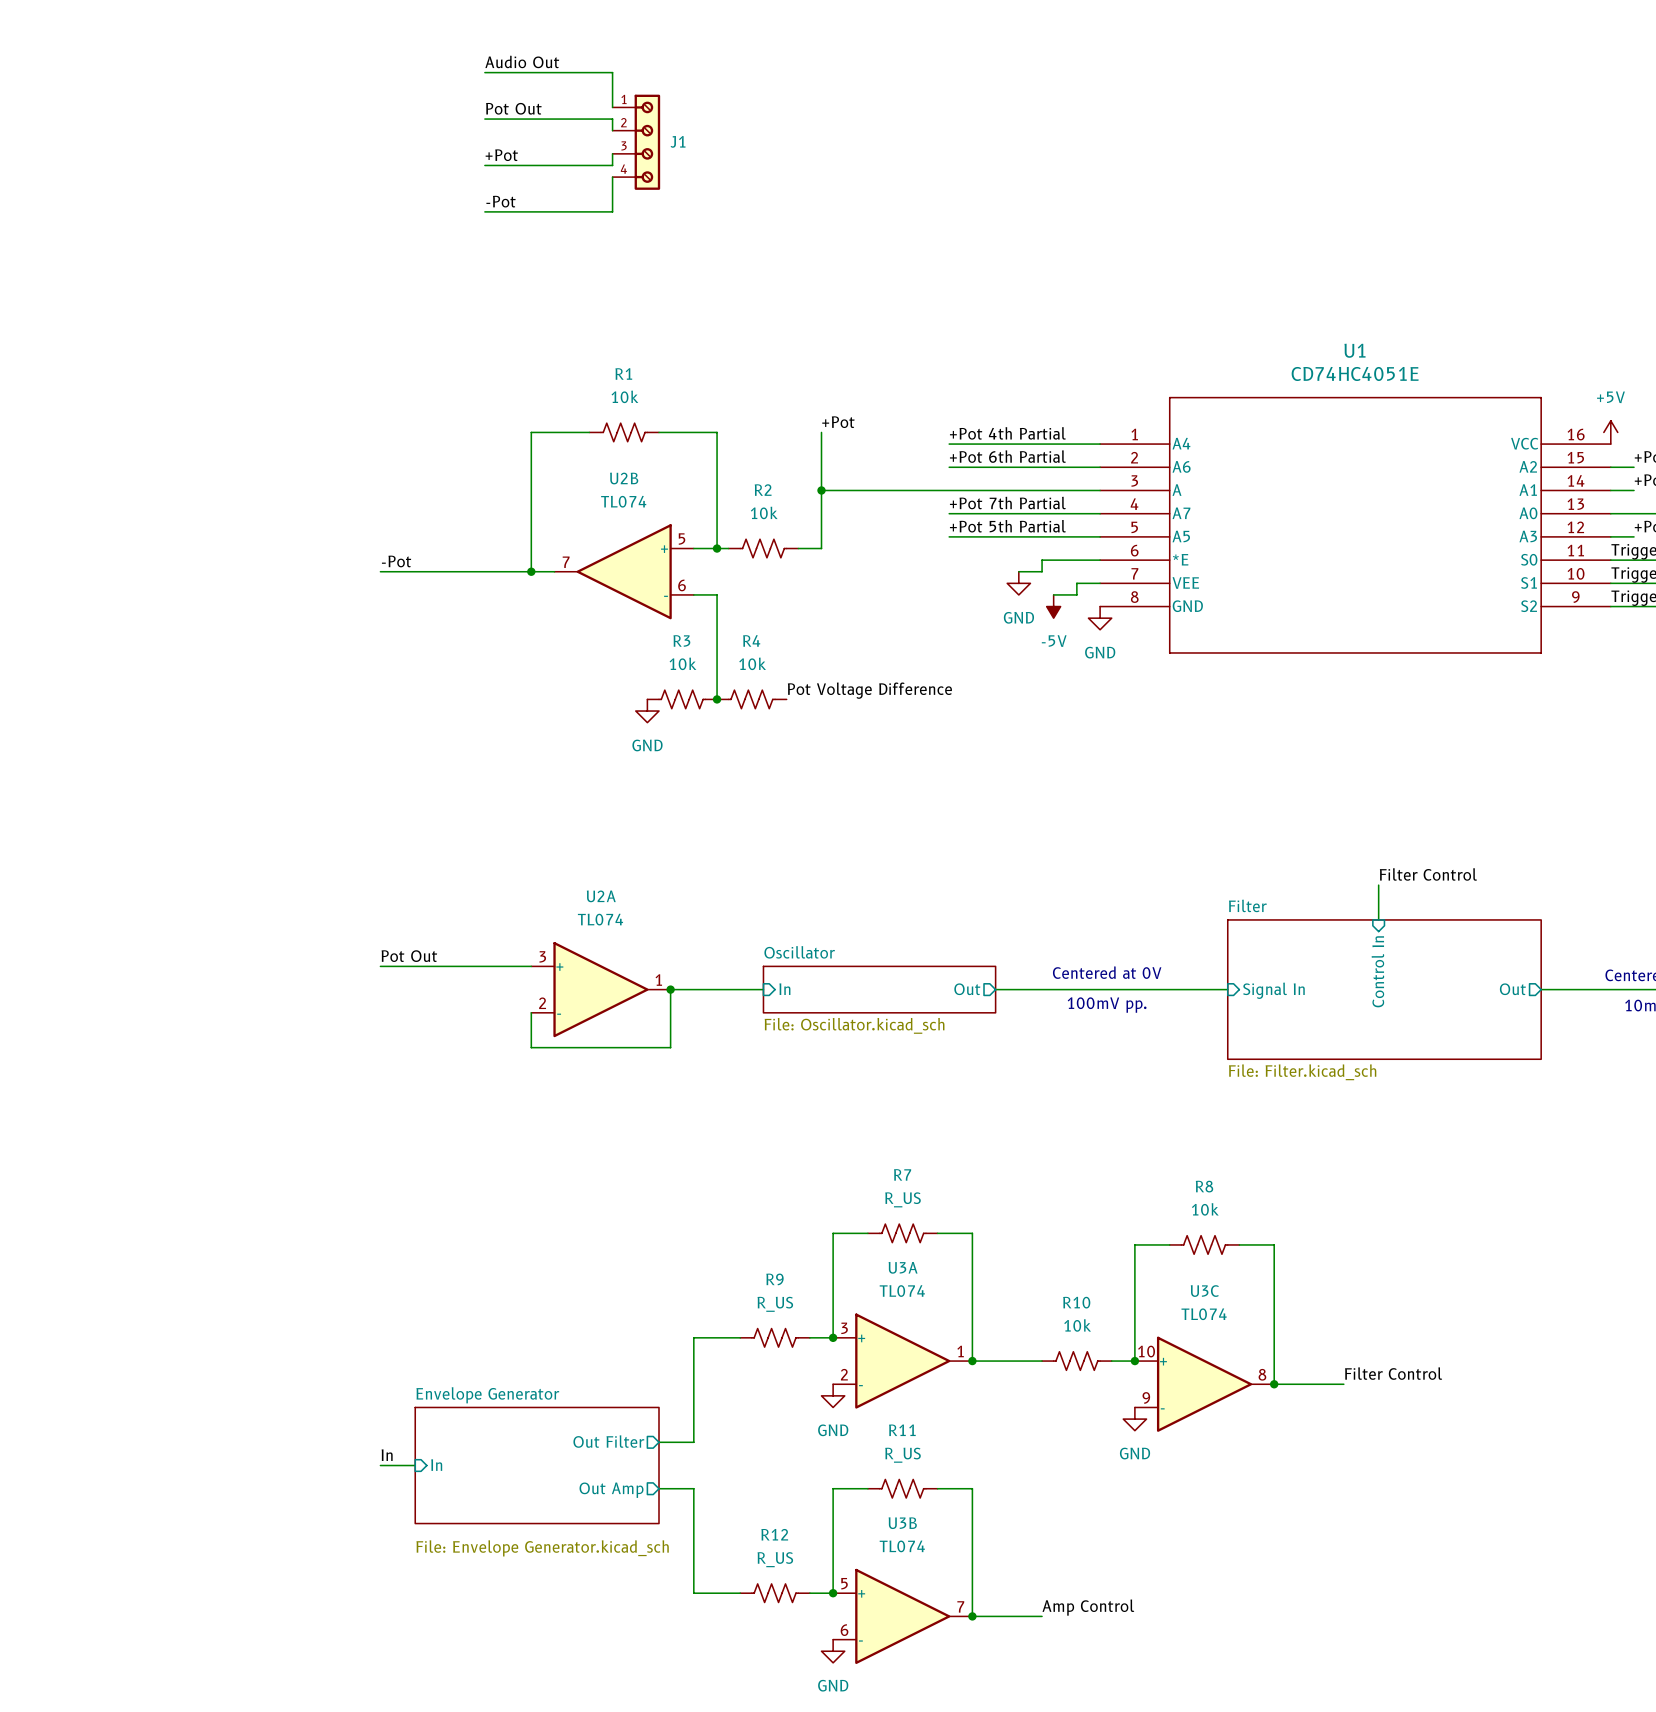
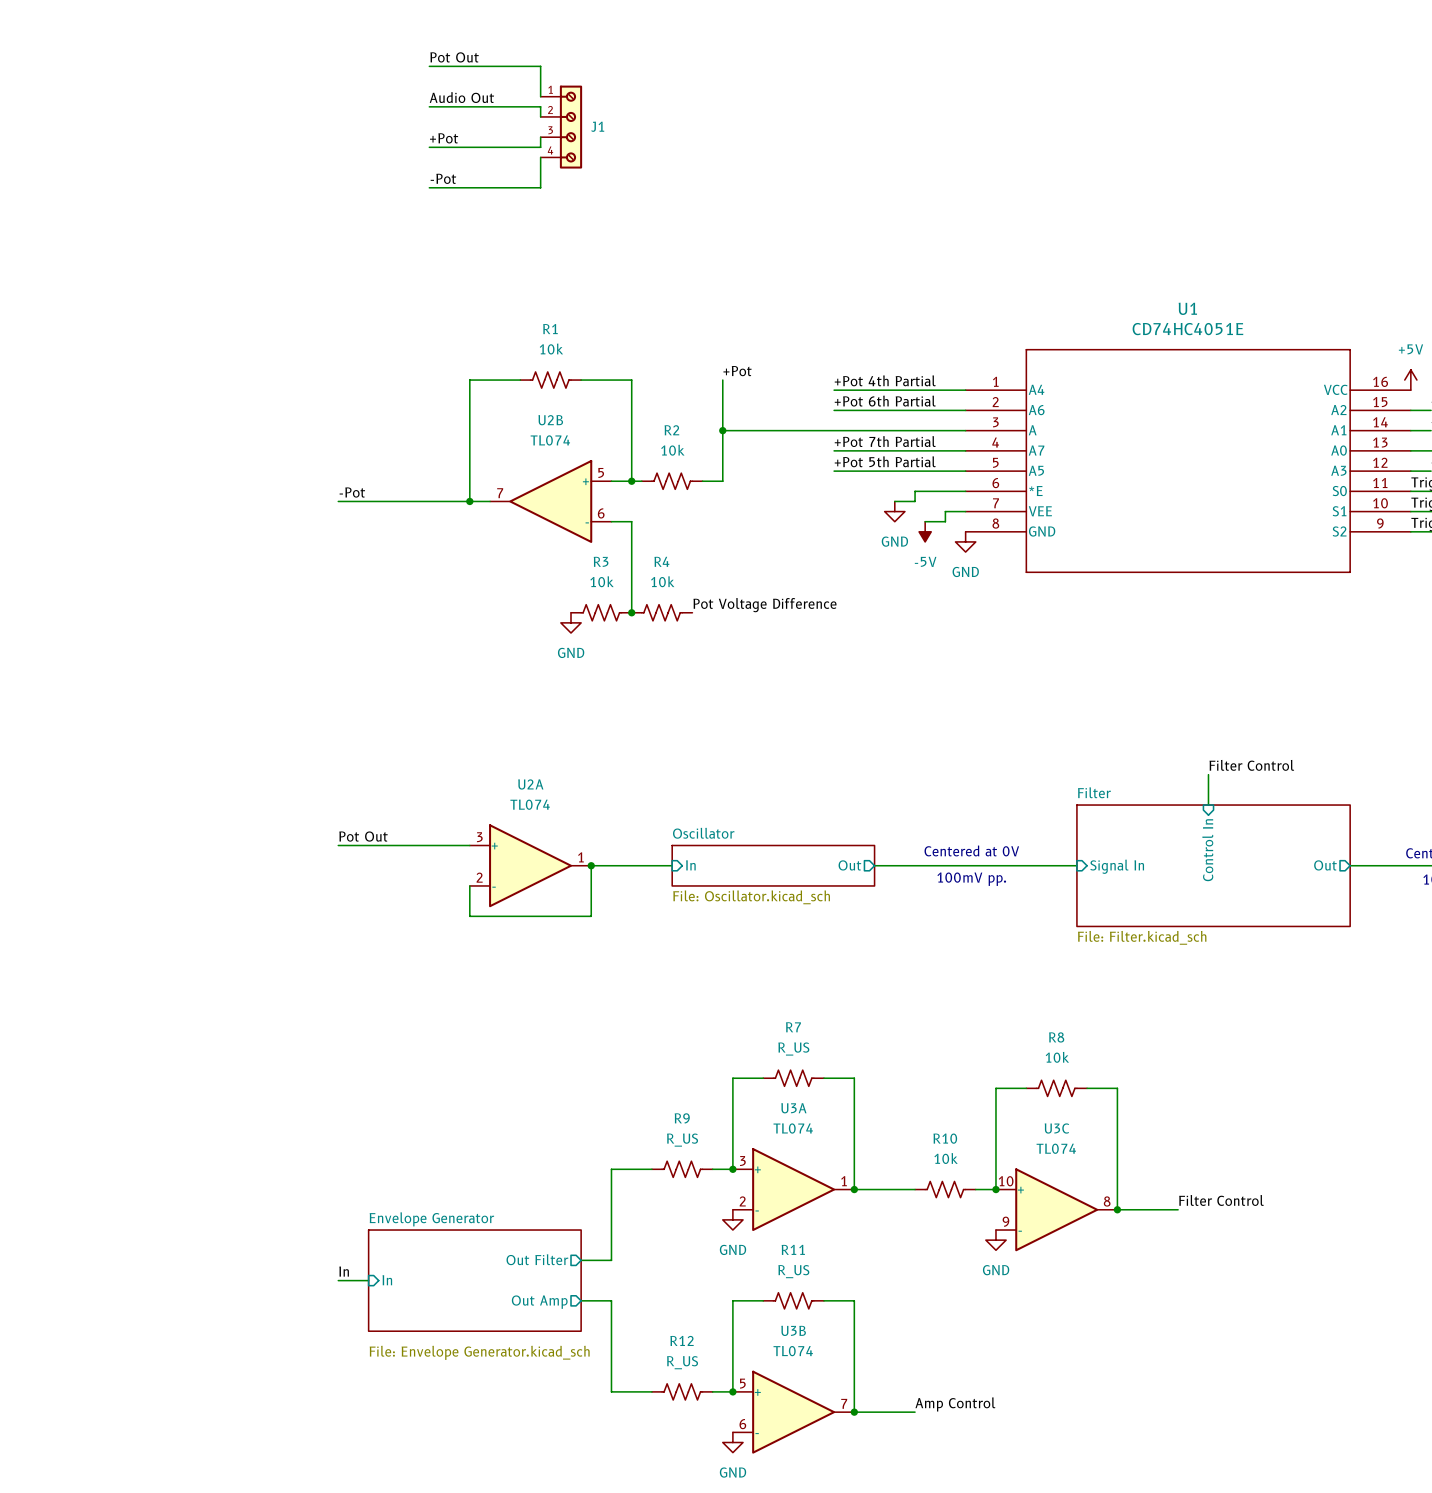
label: Audio Out (522, 61) -> Pot Out (454, 57)
label: Pot Out (513, 108) -> Audio Out (461, 97)

